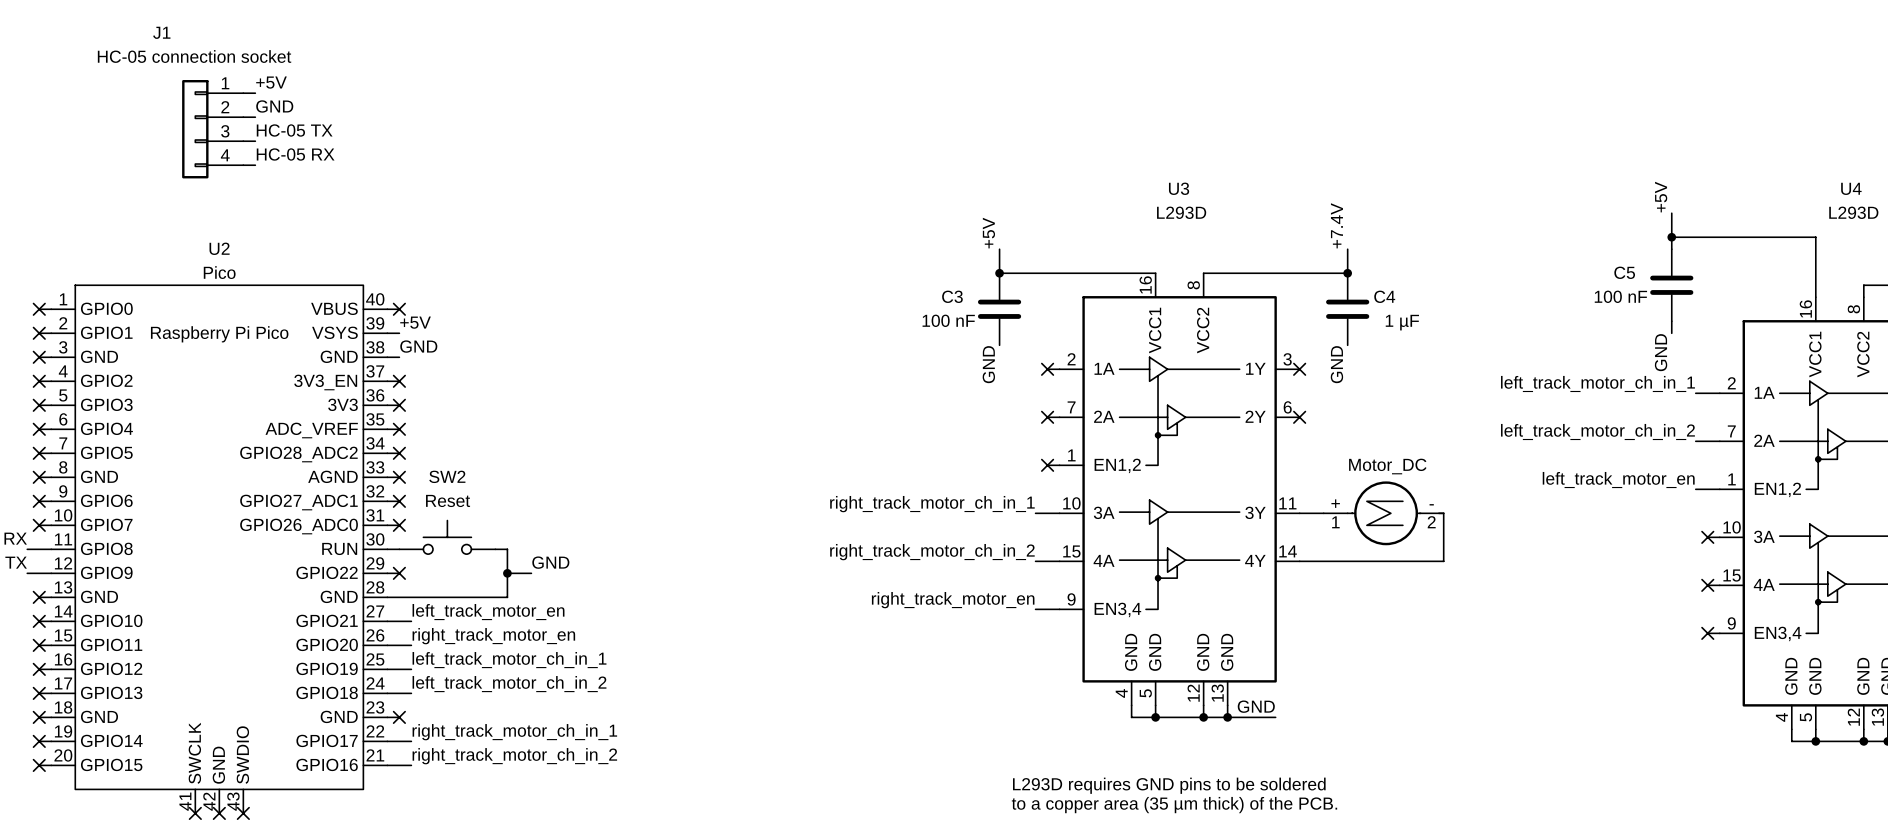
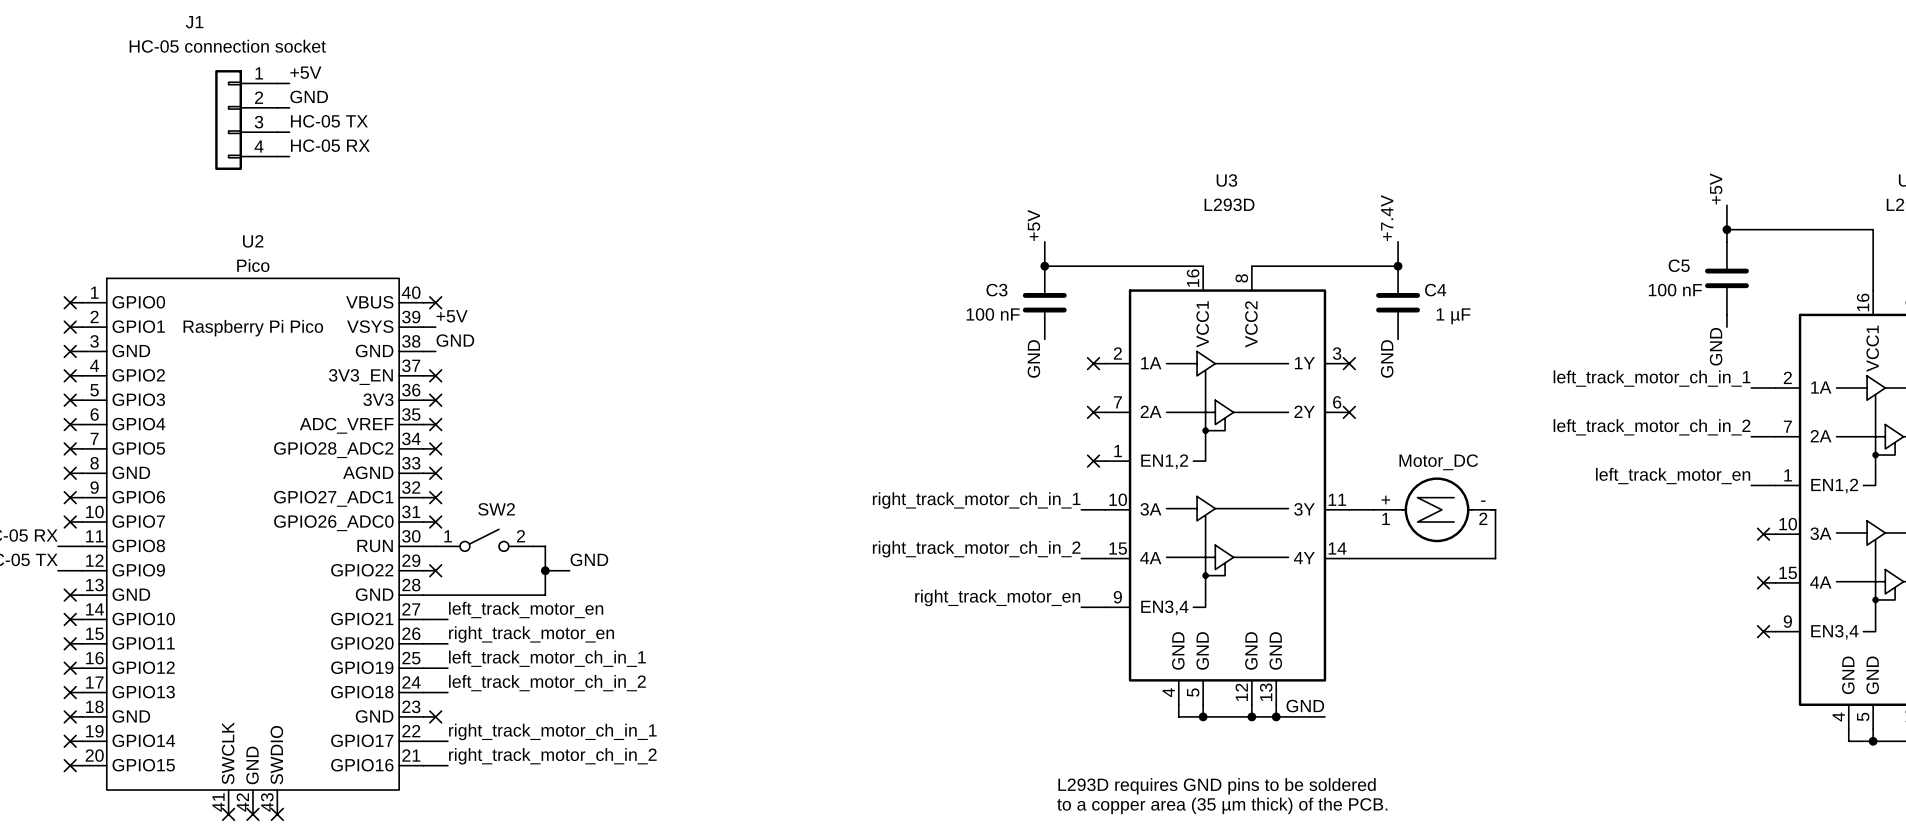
SW2 name position: SW2 (447, 476) -> SW2 (496, 509)
SW2 value: Reset (448, 500) -> none
SW2 symbol: [399, 520, 496, 555] -> [435, 529, 534, 552]

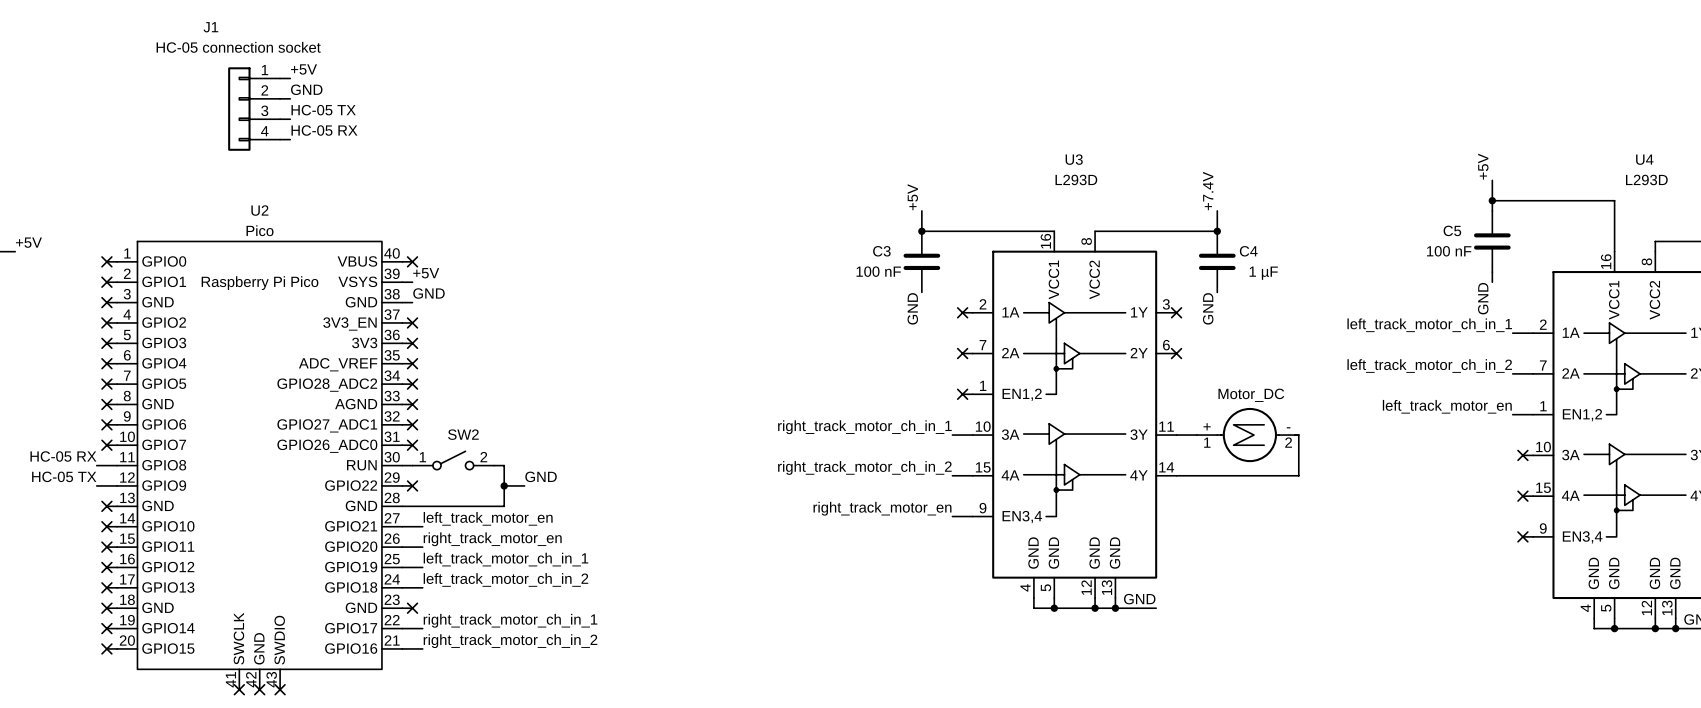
text: L293D requires GND pins to be soldered (1217, 786) -> none
text: to a copper area (35 µm thick) of the PCB. (1222, 805) -> none

